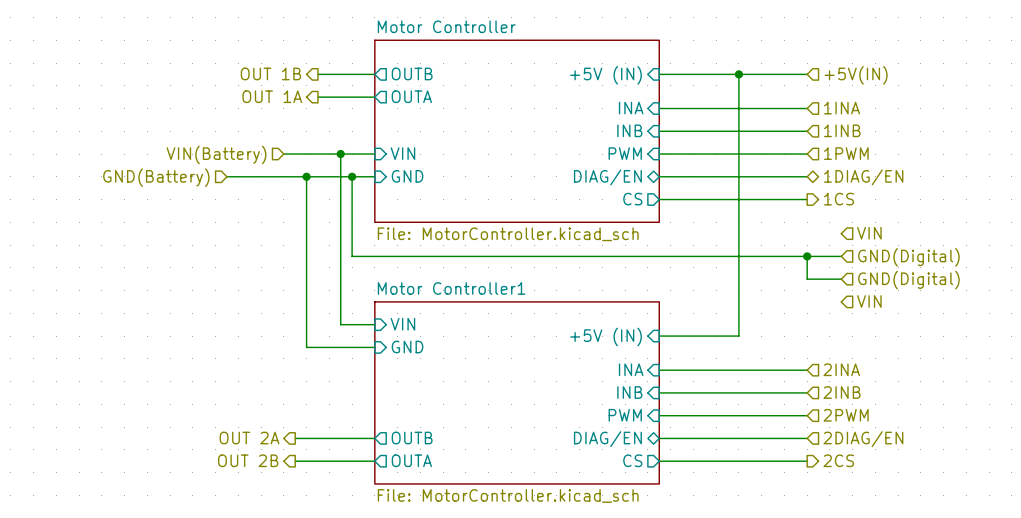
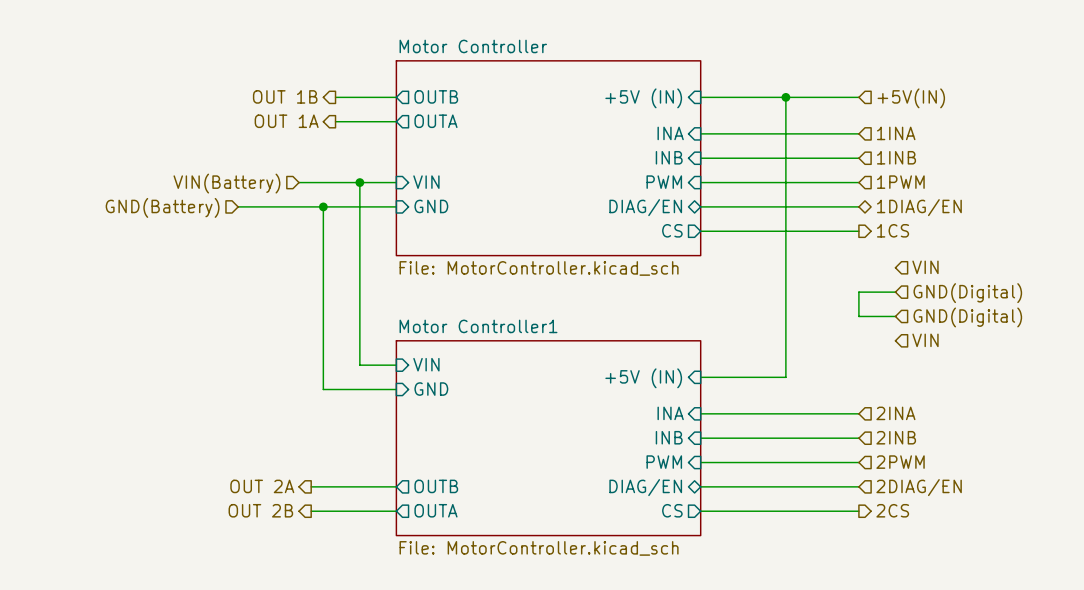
wire: (352, 176) (352, 256) (807, 256) -> none
junction: (352, 176) -> none
junction: (807, 256) -> none

